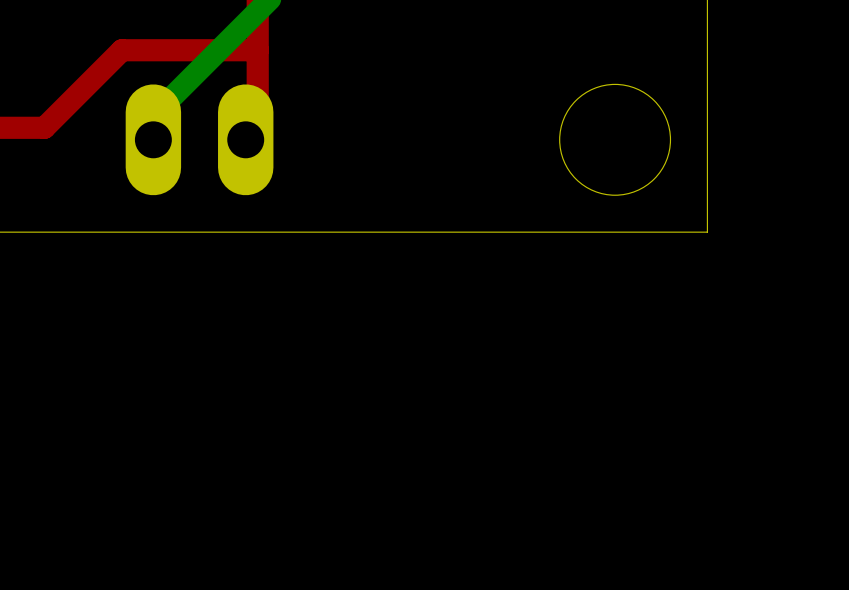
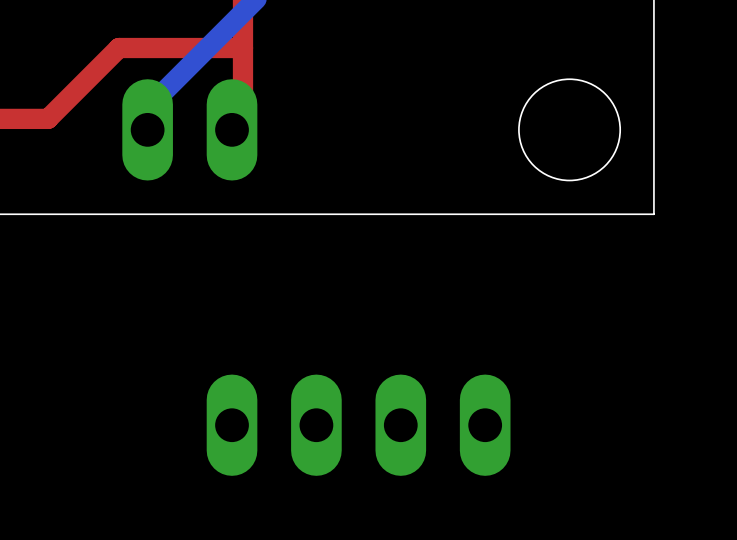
part: none -> (358, 425)

